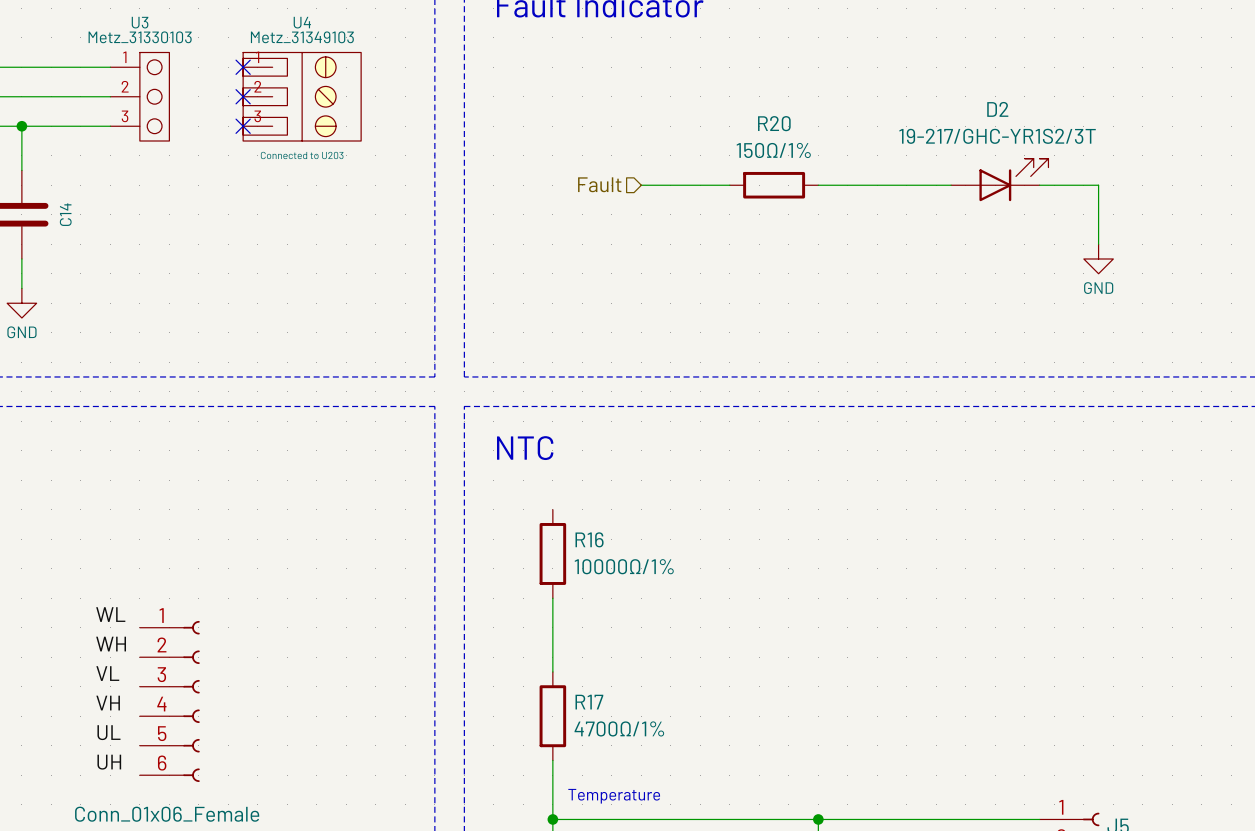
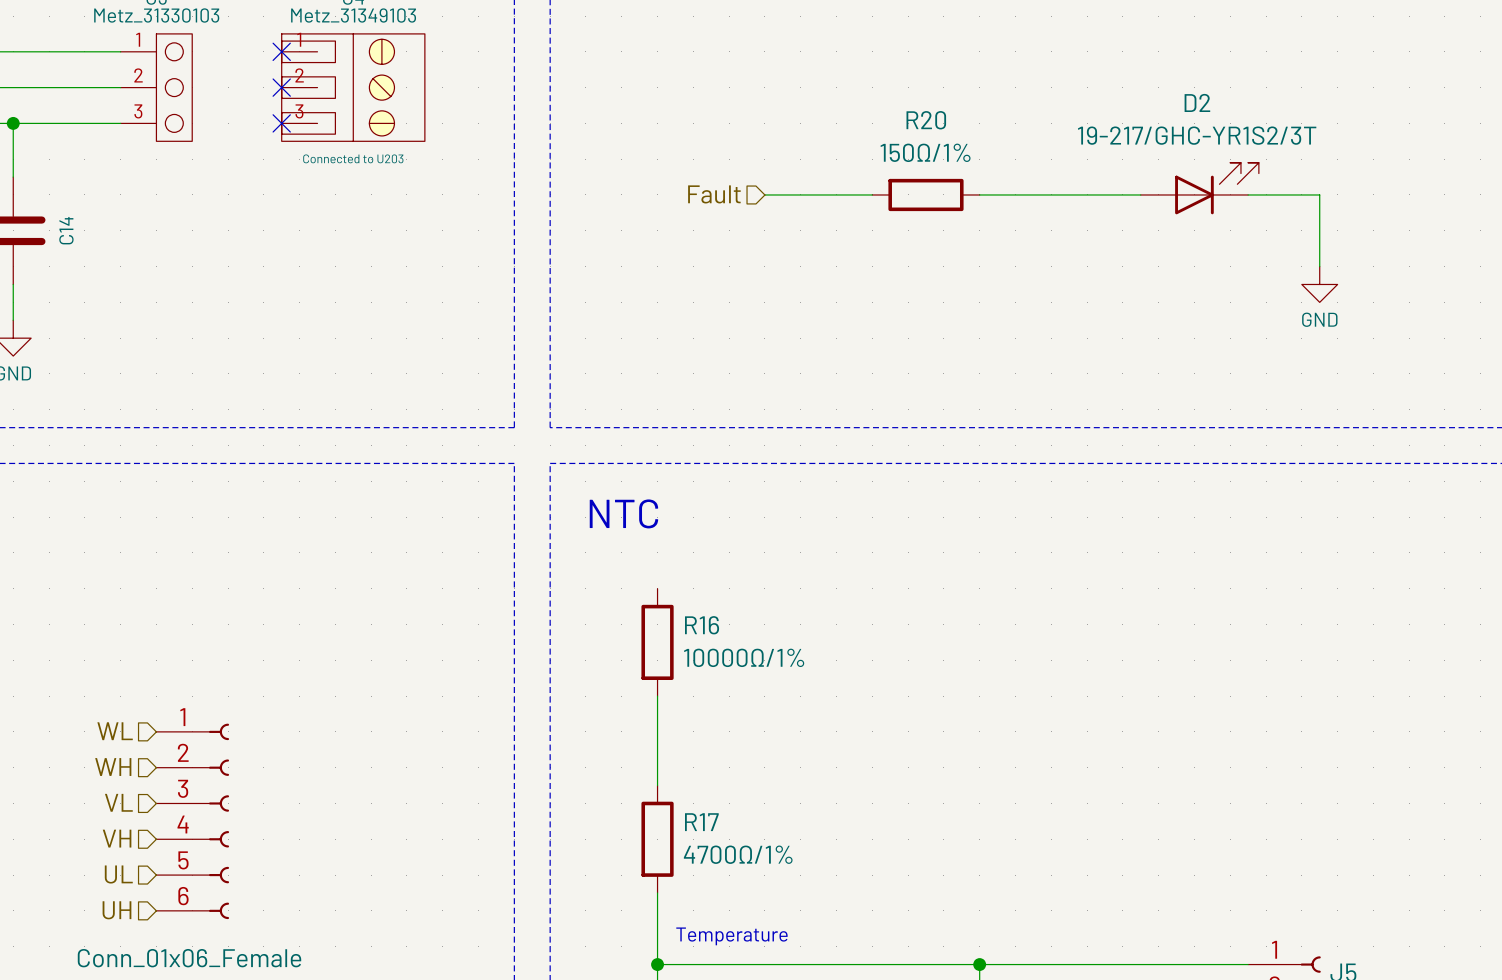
label: WL (110, 614) -> none
hierarchical label: none -> WL (115, 731)
label: WH (111, 644) -> none
hierarchical label: none -> WH (113, 767)
label: VL (107, 673) -> none
hierarchical label: none -> VL (118, 802)
label: VH (108, 703) -> none
hierarchical label: none -> VH (117, 838)
label: UL (108, 732) -> none
hierarchical label: none -> UL (118, 874)
label: UH (109, 762) -> none
hierarchical label: none -> UH (116, 910)

